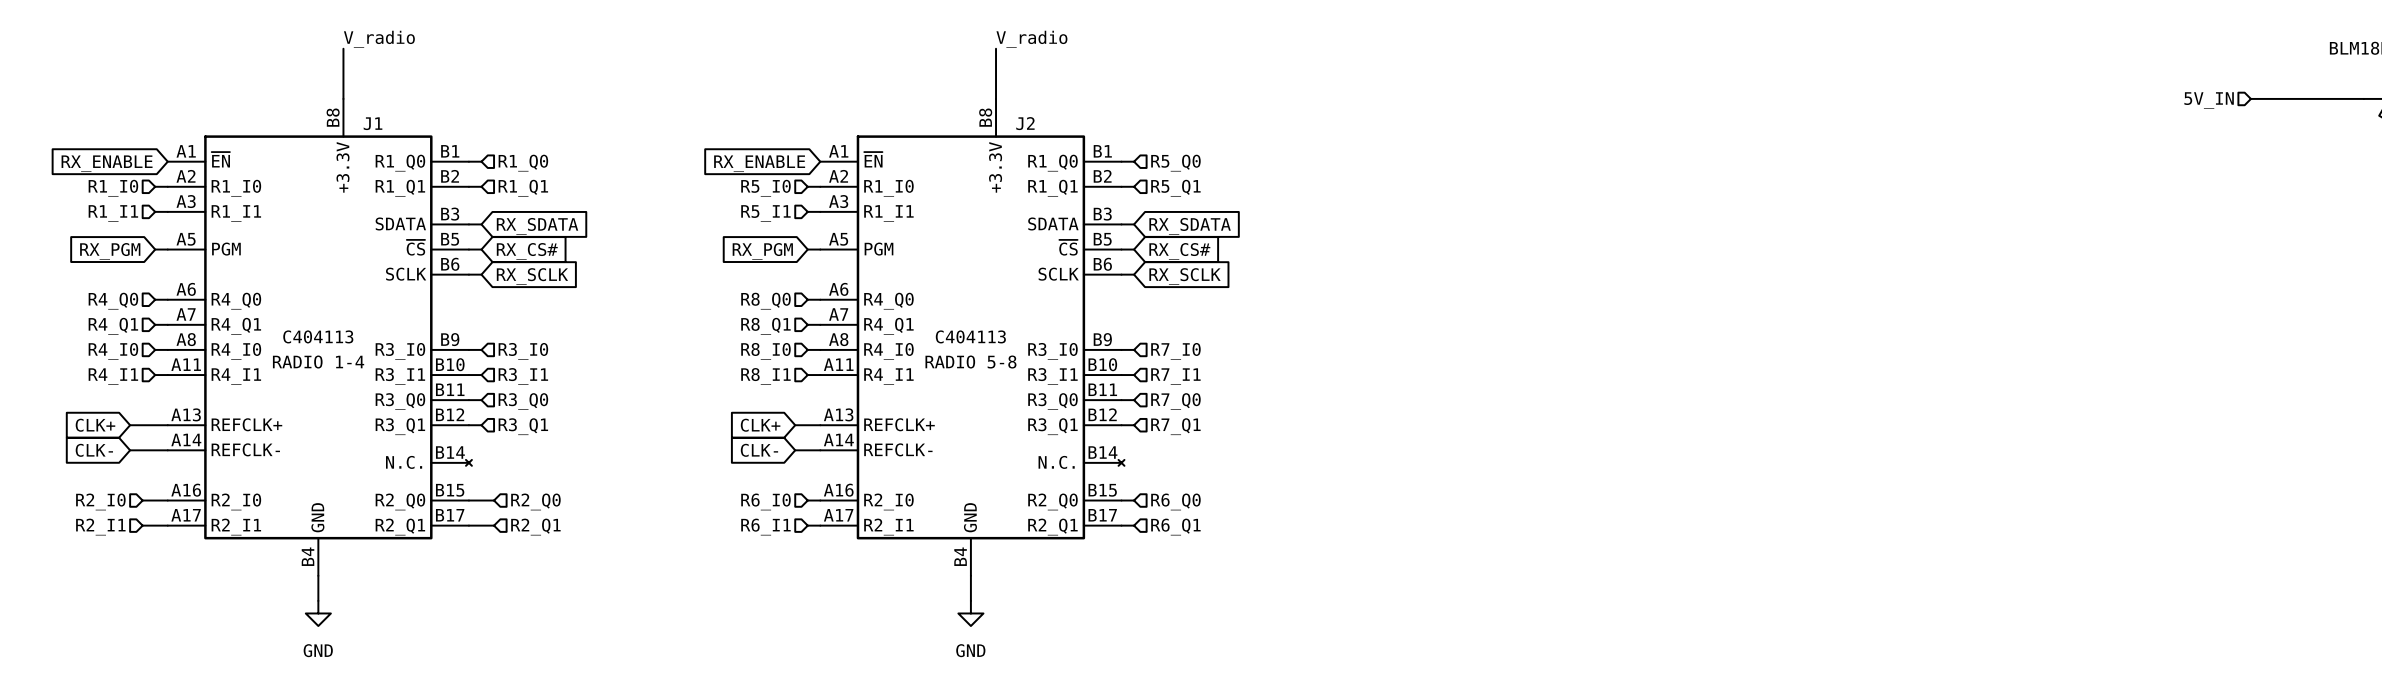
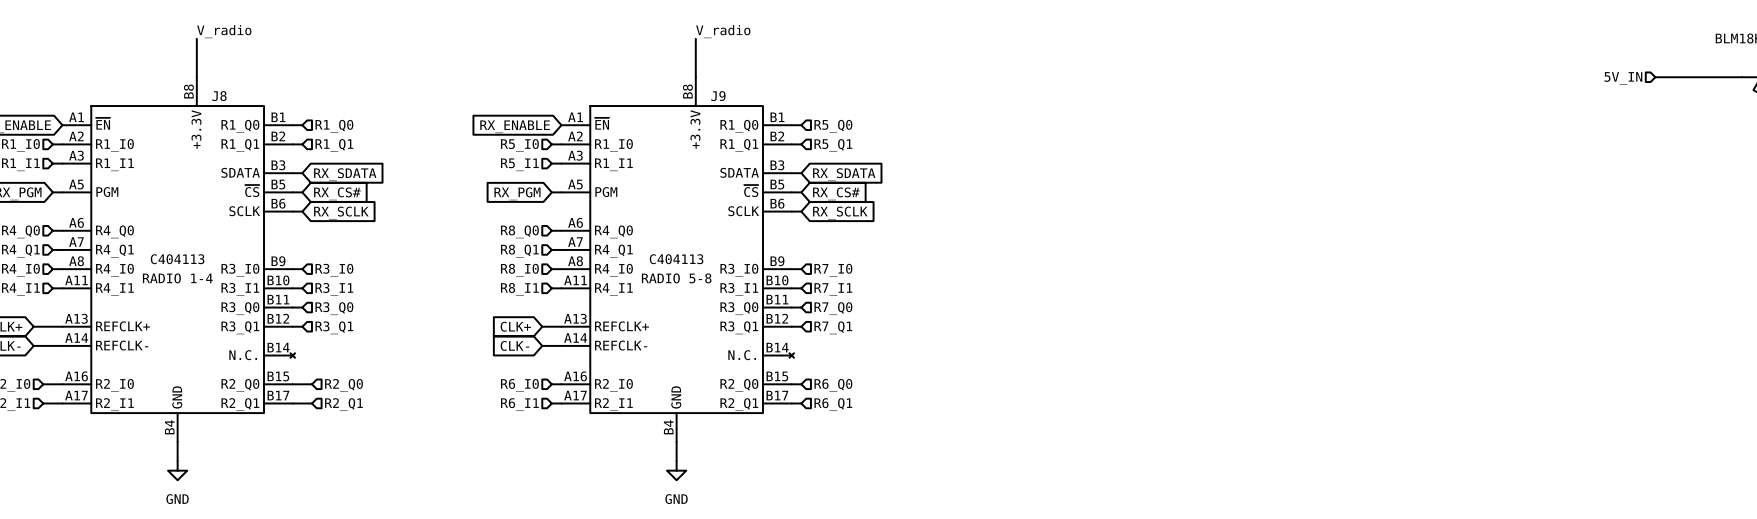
J1 name: J1 (373, 123) -> J8 (219, 96)
J2 name: J2 (1025, 123) -> J9 (718, 96)

